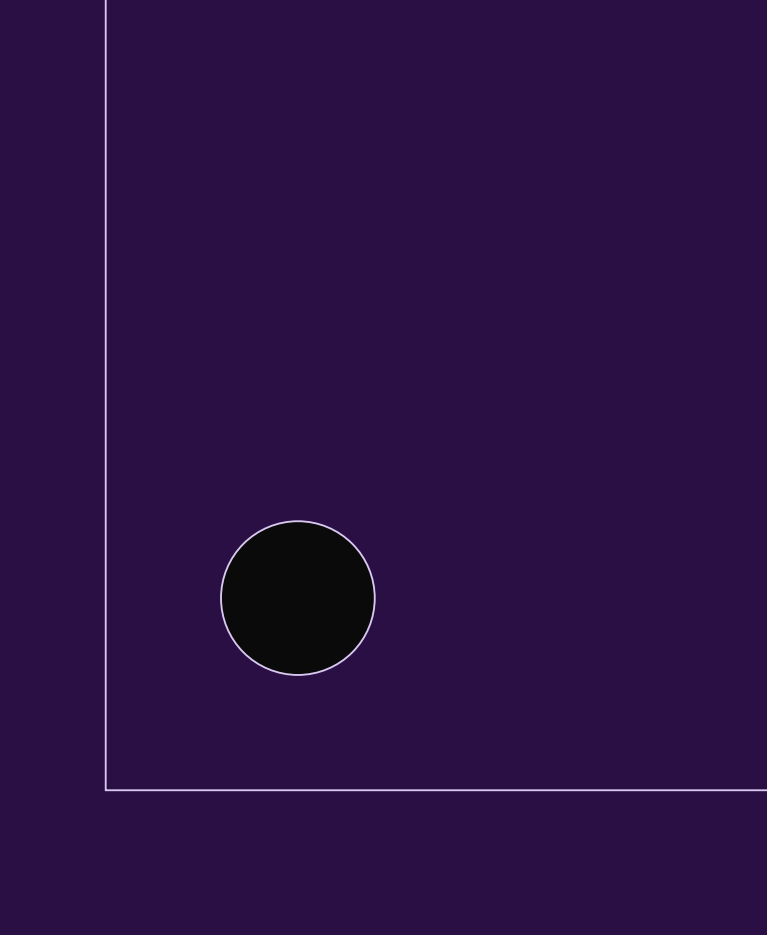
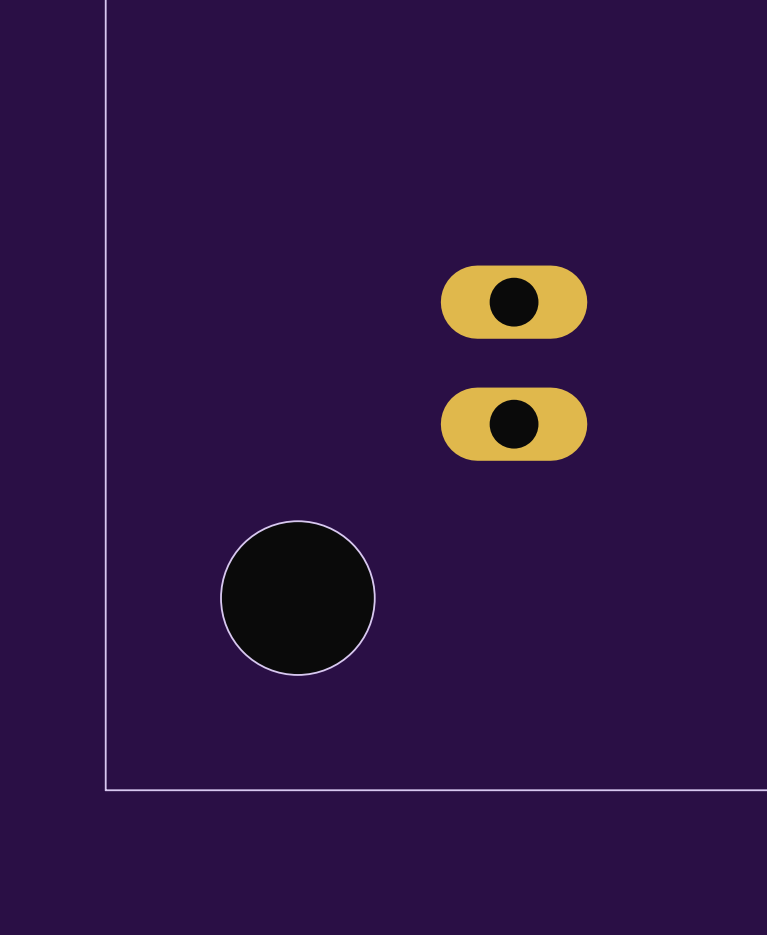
part: none -> (514, 363)

